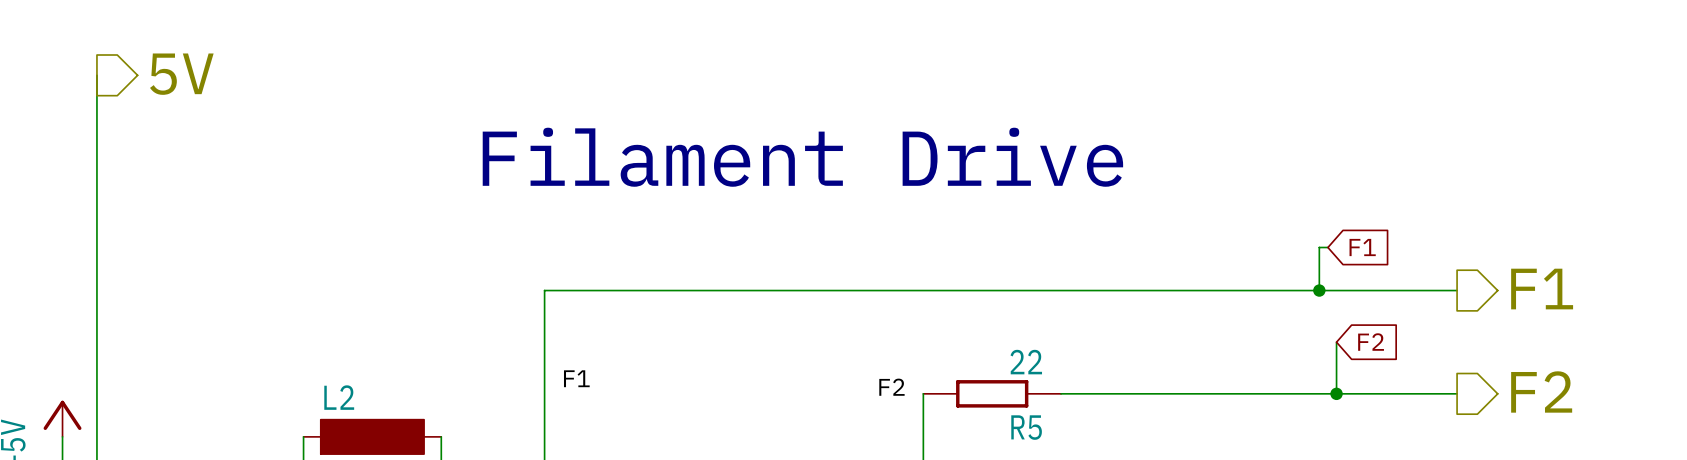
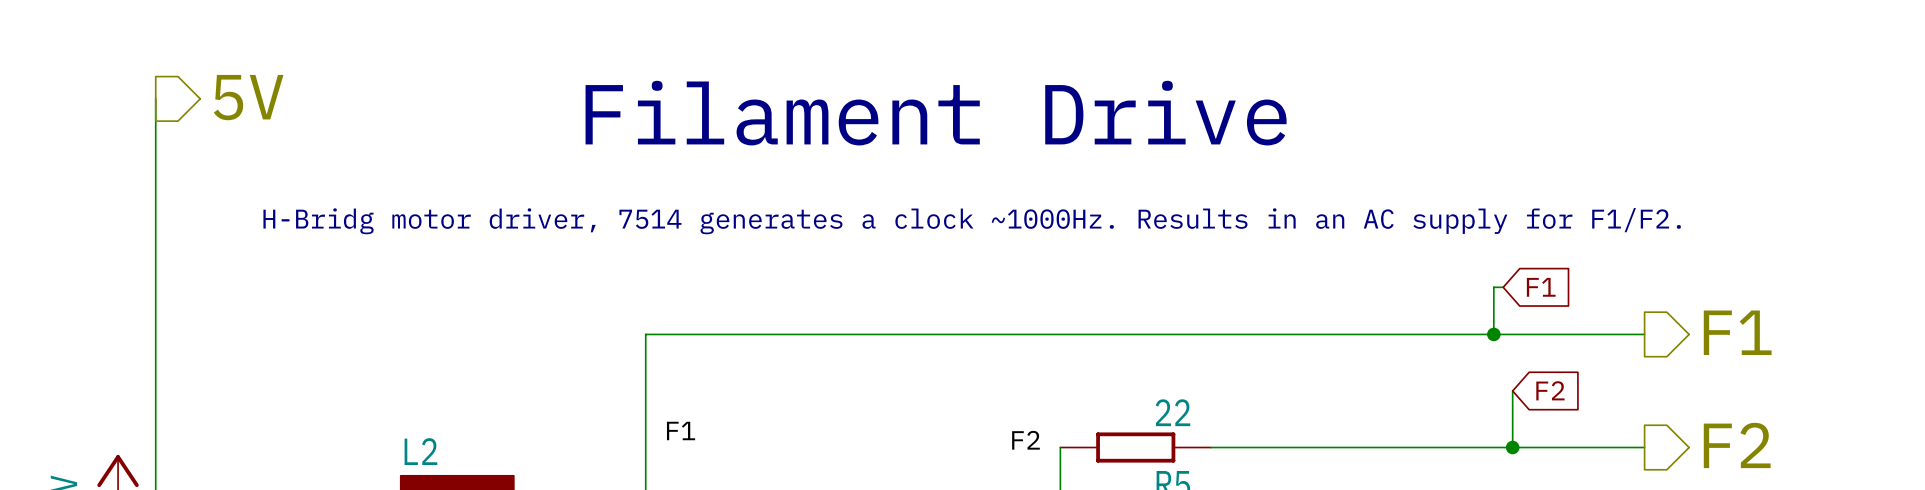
text position: Filament Drive (802, 157) -> Filament Drive (936, 113)
text: none -> H-Bridg motor driver, 7514 generates a clock ~1000Hz. Results in an AC supply for F1/F2. (972, 221)

